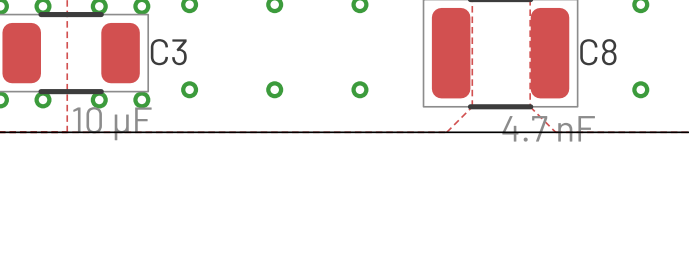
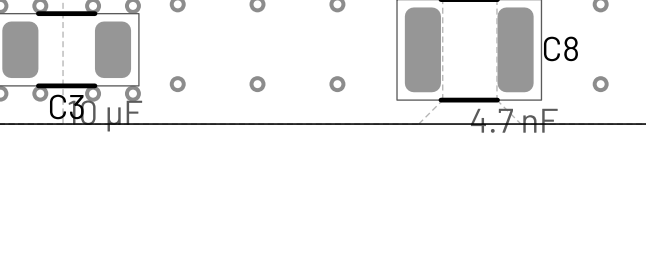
C3 name position: C3 (168, 52) -> C3 (66, 106)

